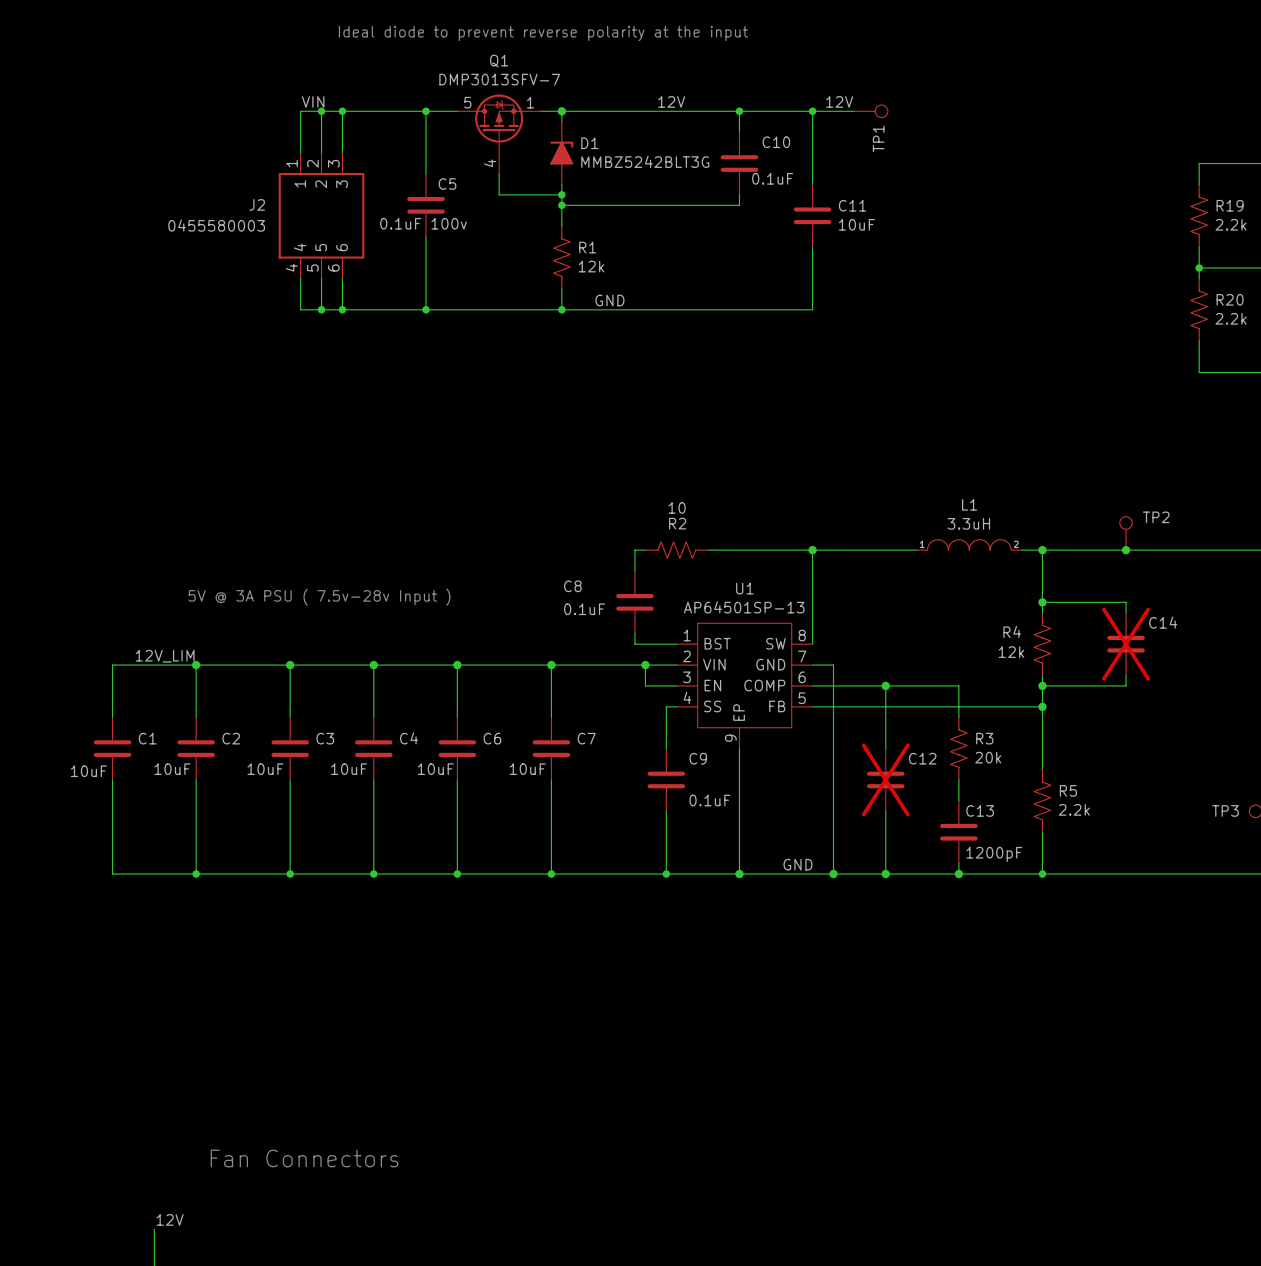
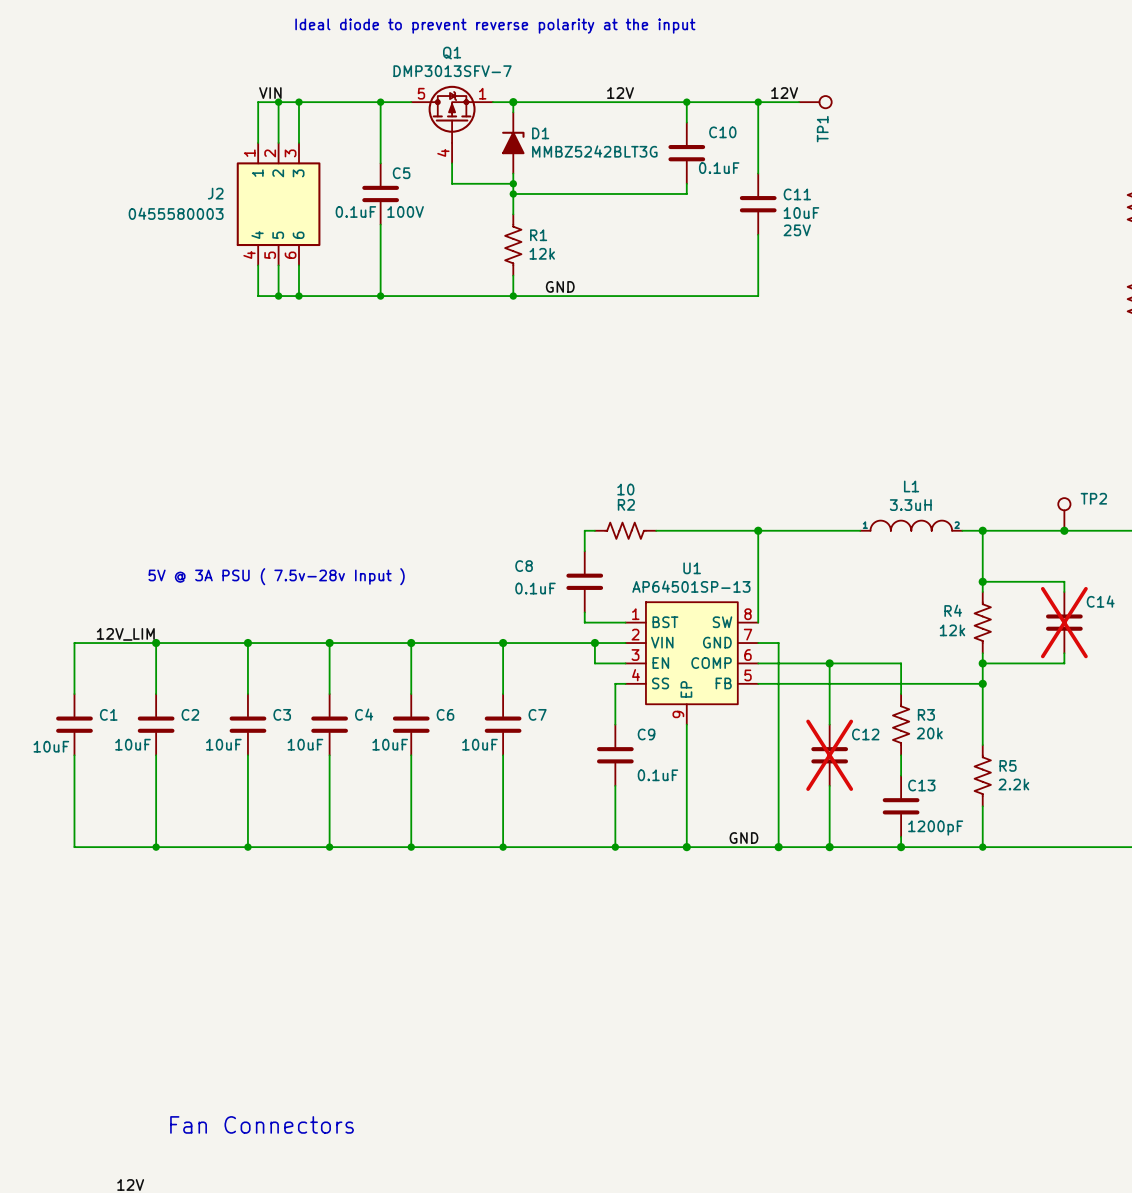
C5 value: 0.1uF 100v (423, 223) -> 0.1uF (355, 211)
C5 text: none -> 100V (405, 211)
C11 text: none -> 25V (797, 230)

